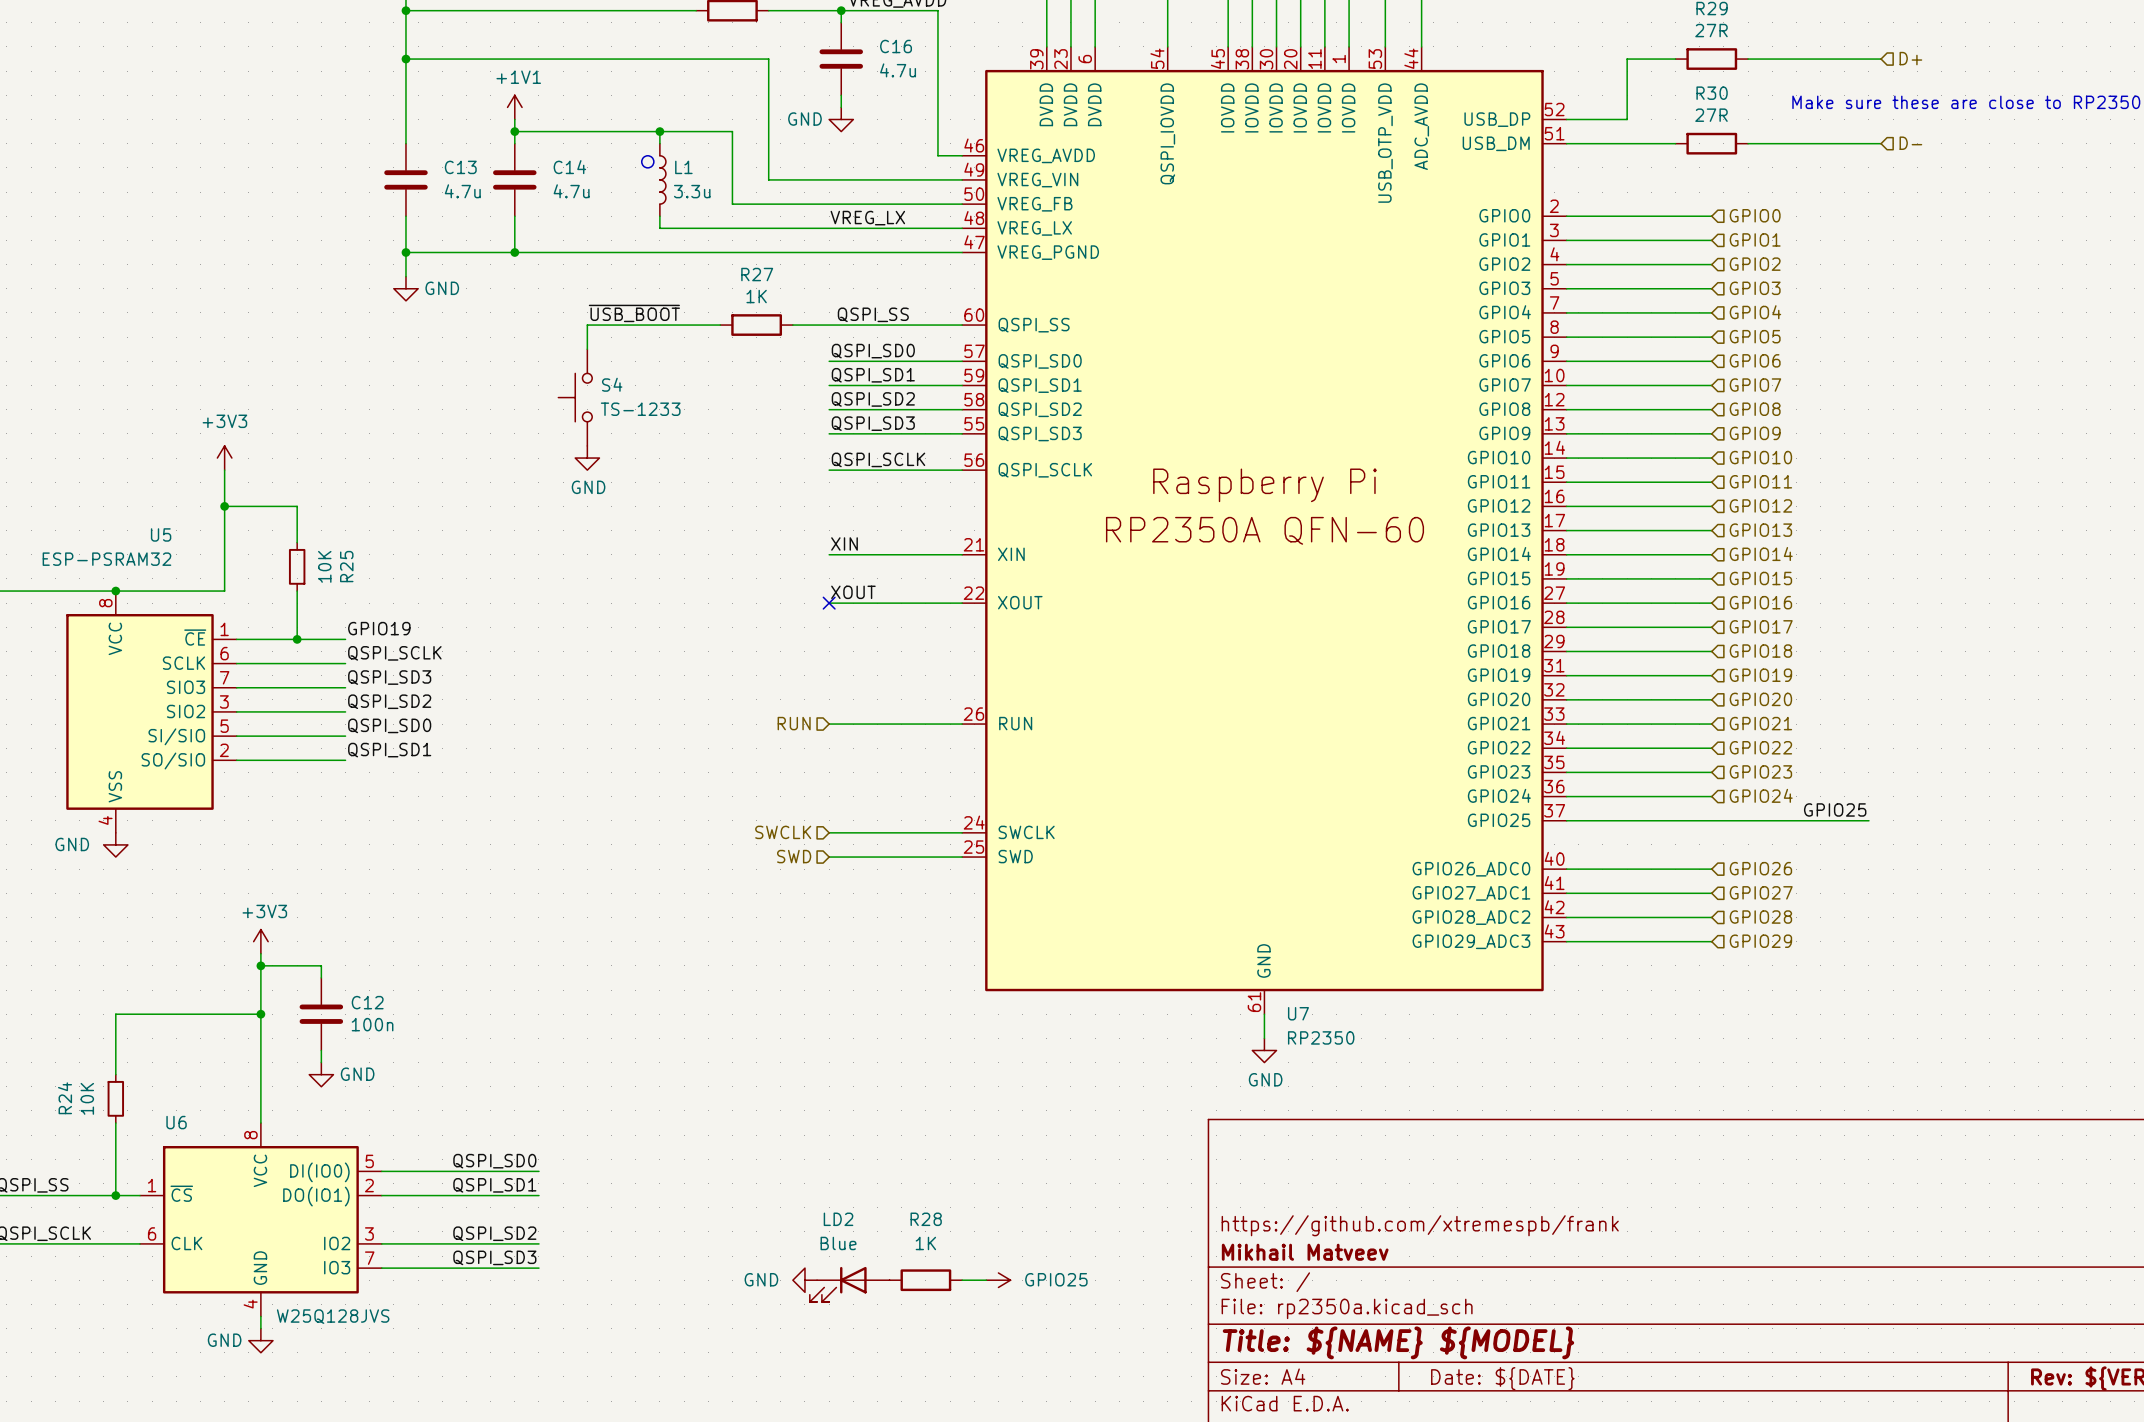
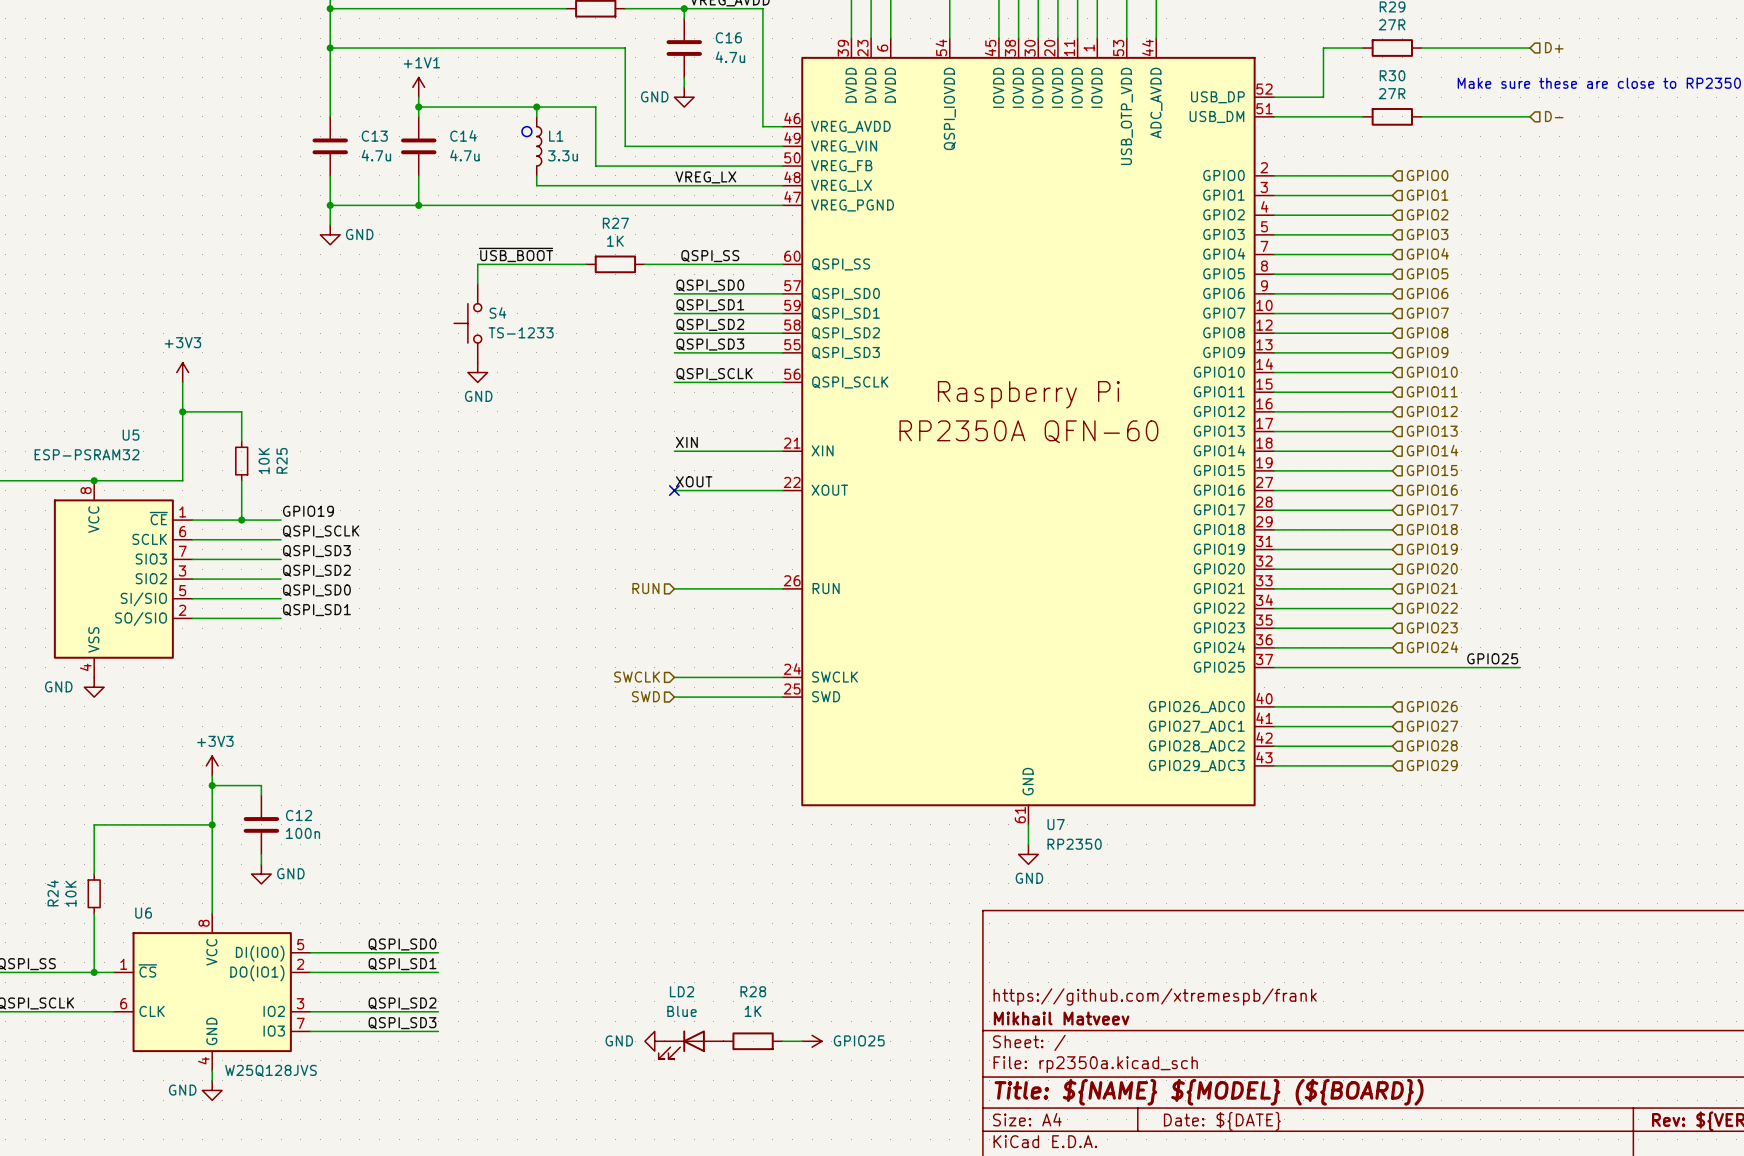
title block: Title: ${NAME} ${MODEL} (1398, 1342) -> Title: ${NAME} ${MODEL} (${BOARD}) (1209, 1092)

